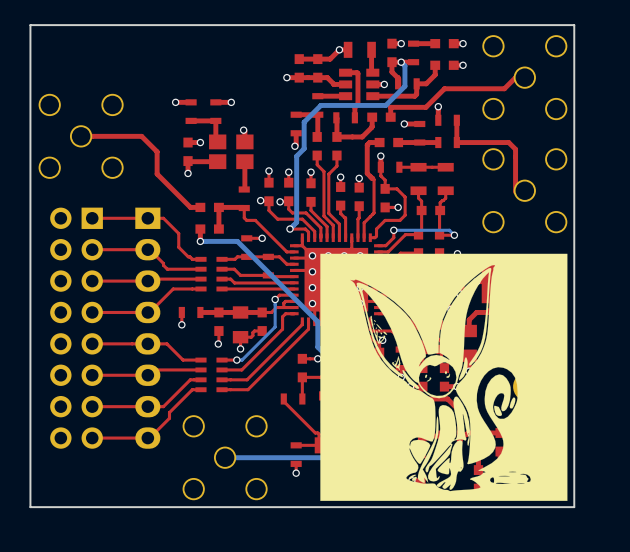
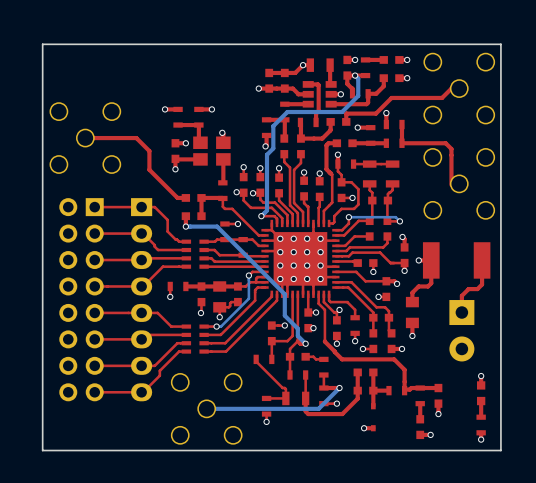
drawing: [320, 253, 568, 501] -> none

